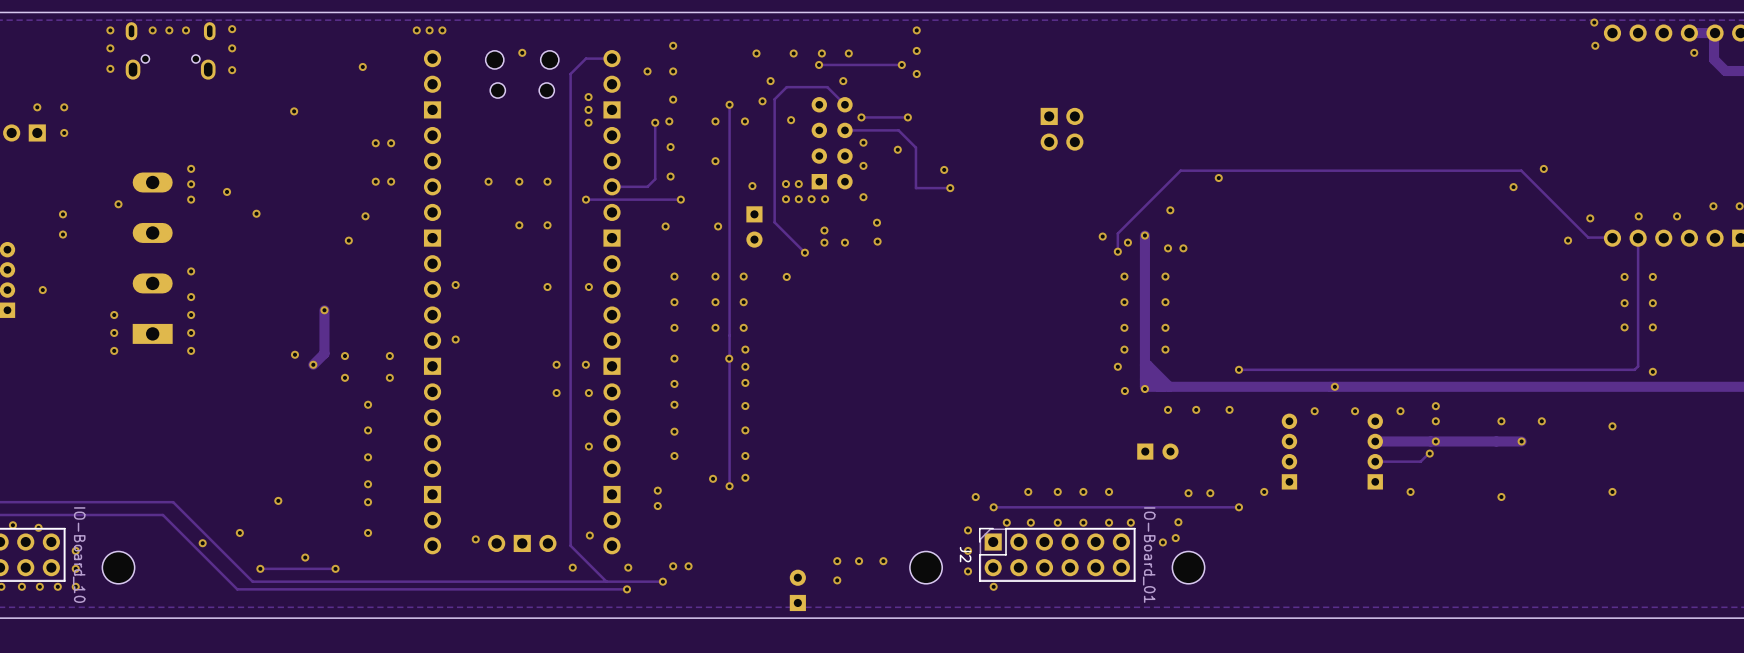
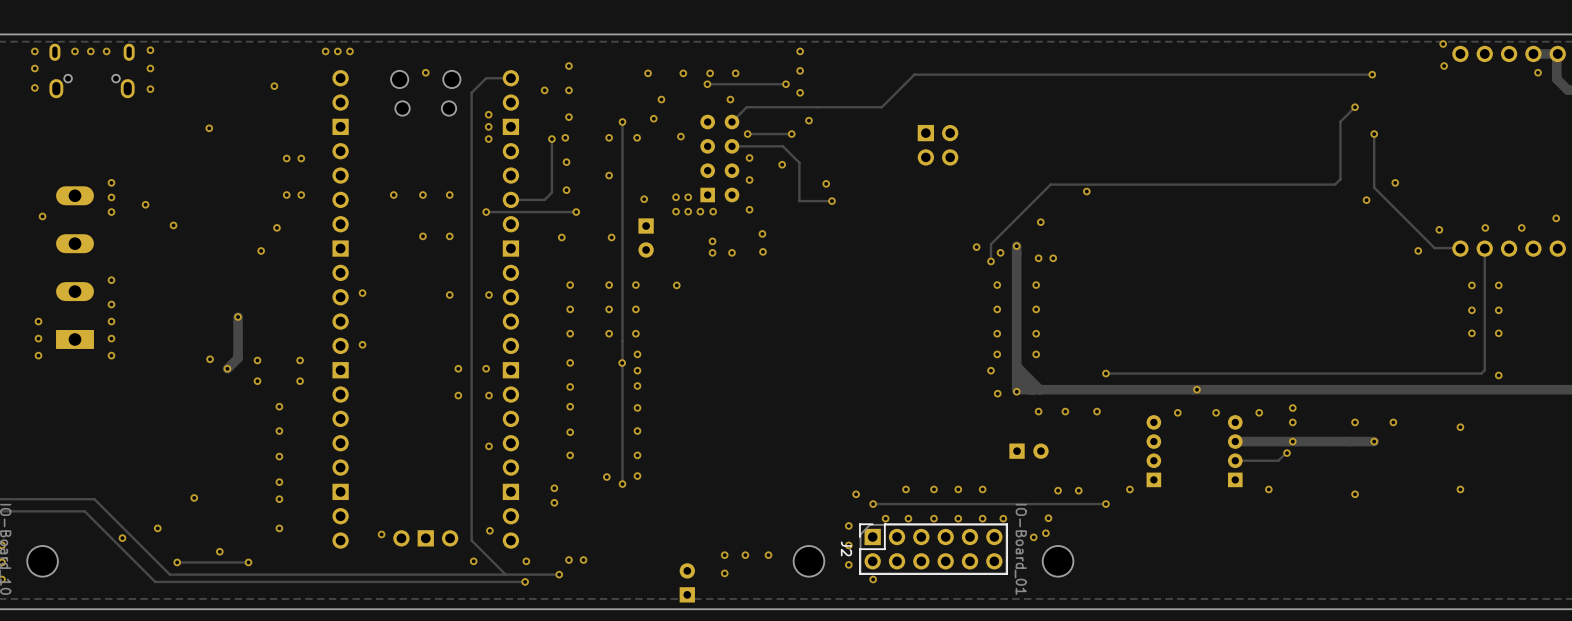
via: none -> (1372, 74)
track: none -> (1355, 107) (1340, 121) (1340, 179) (1335, 184)
via: none -> (1355, 107)
via: none -> (808, 120)
track: (844, 104) (827, 87) (786, 87) (774, 99) (774, 222) (804, 252) -> (732, 122) (746, 107) (881, 107) (914, 74) (1372, 74)
via: none -> (1374, 134)
track: (1480, 170) (1521, 170) (1588, 237) -> (1374, 134) (1374, 187) (1434, 248) (1437, 248)
via: (804, 252) -> none

